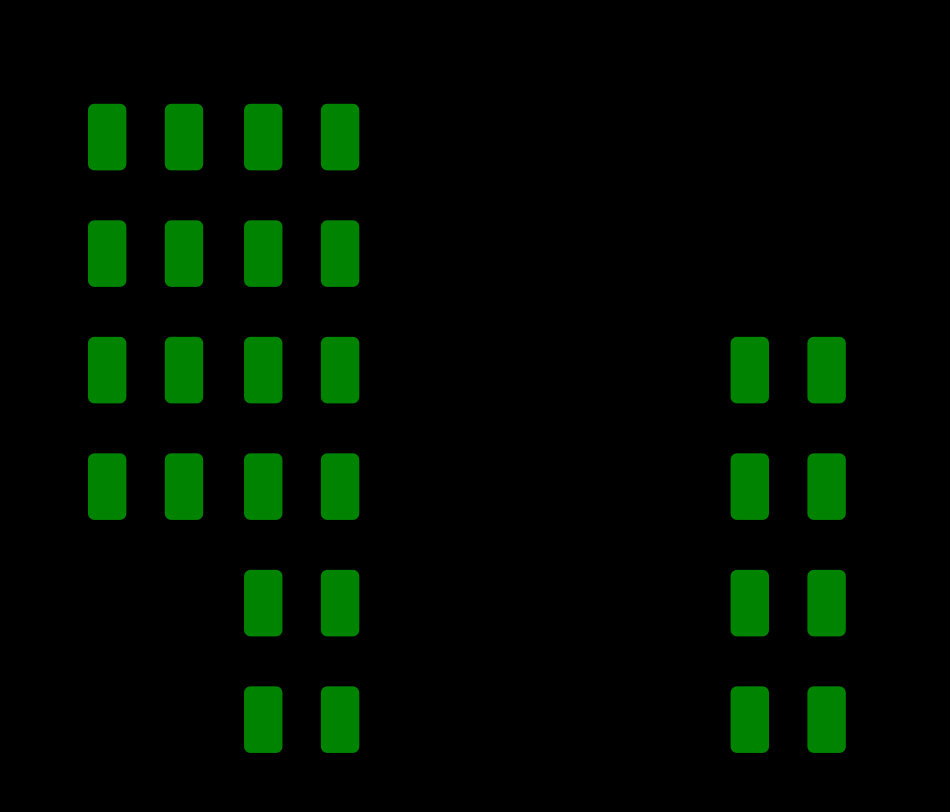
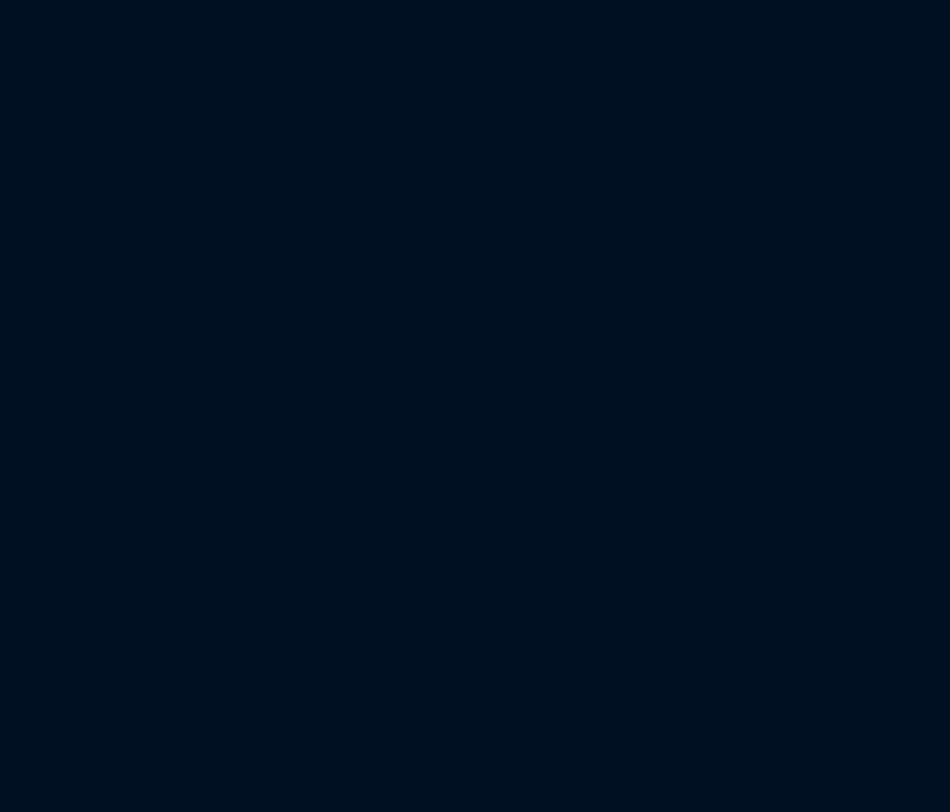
part: (145, 137) -> none
part: (301, 137) -> none
part: (145, 253) -> none
part: (301, 253) -> none
part: (145, 370) -> none
part: (301, 370) -> none
part: (788, 370) -> none
part: (145, 486) -> none
part: (301, 486) -> none
part: (788, 486) -> none
part: (301, 603) -> none
part: (788, 603) -> none
part: (301, 719) -> none
part: (788, 719) -> none

